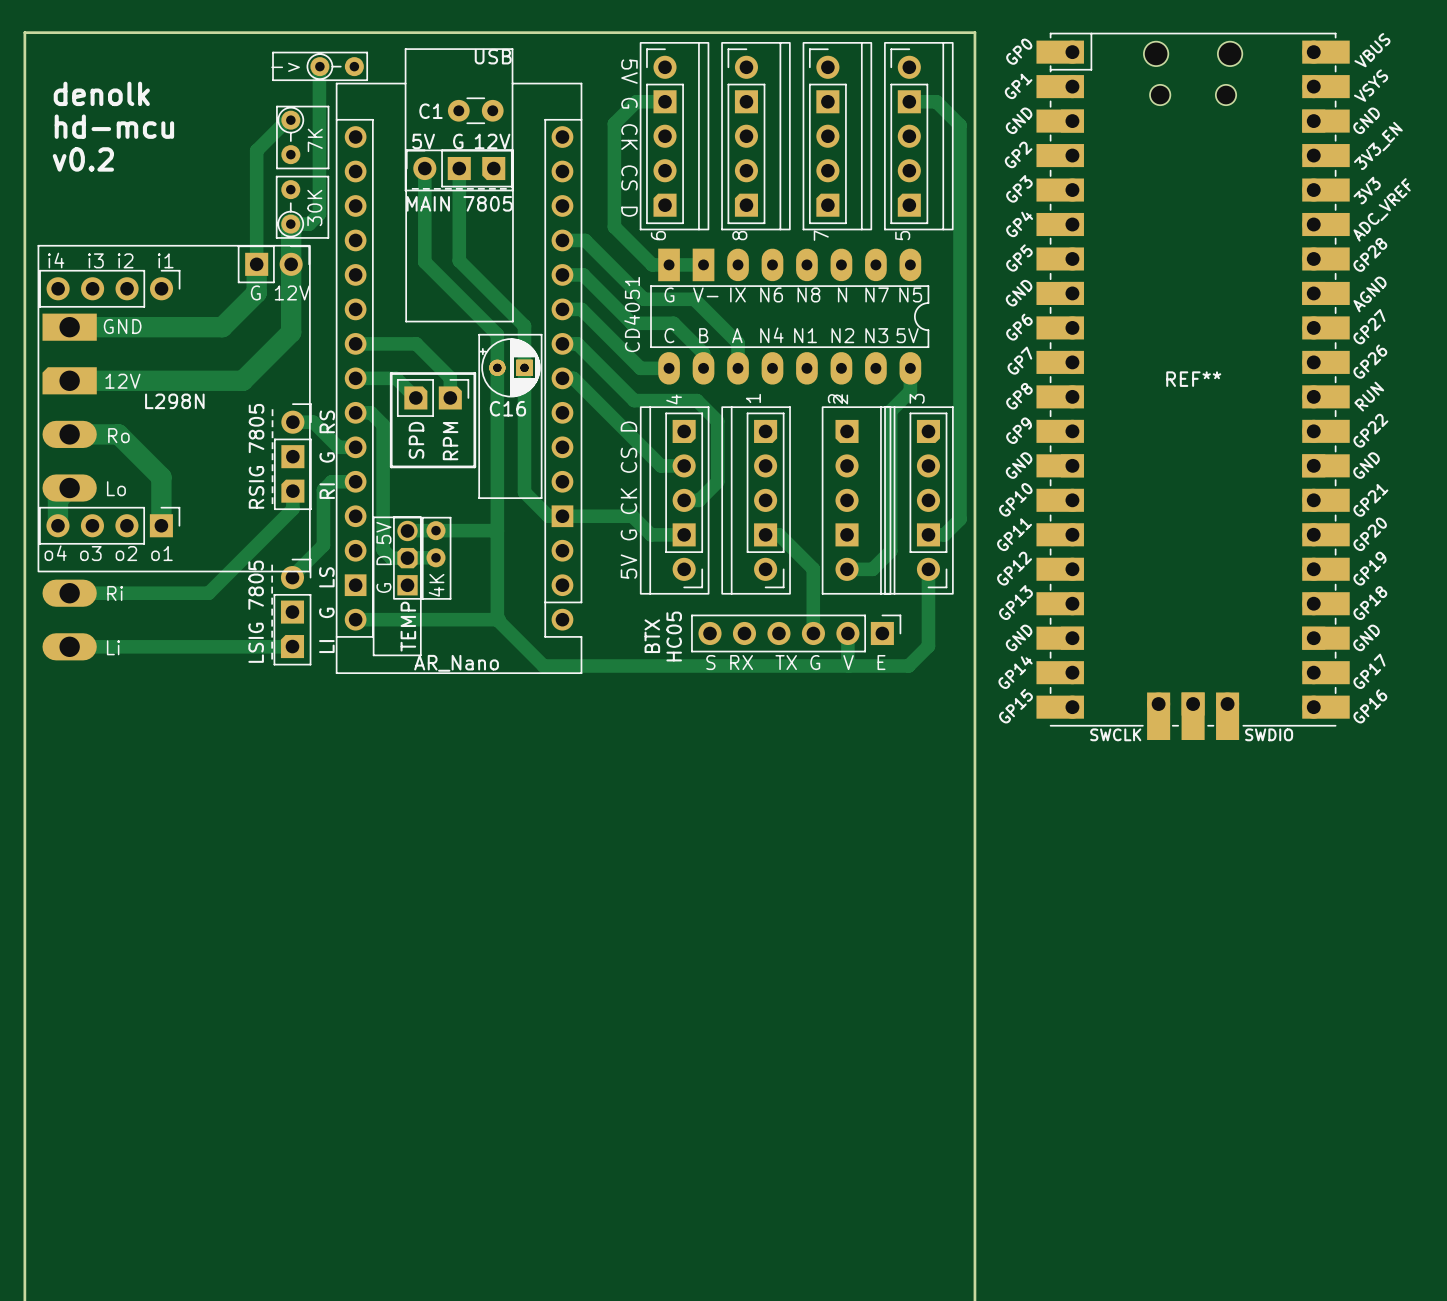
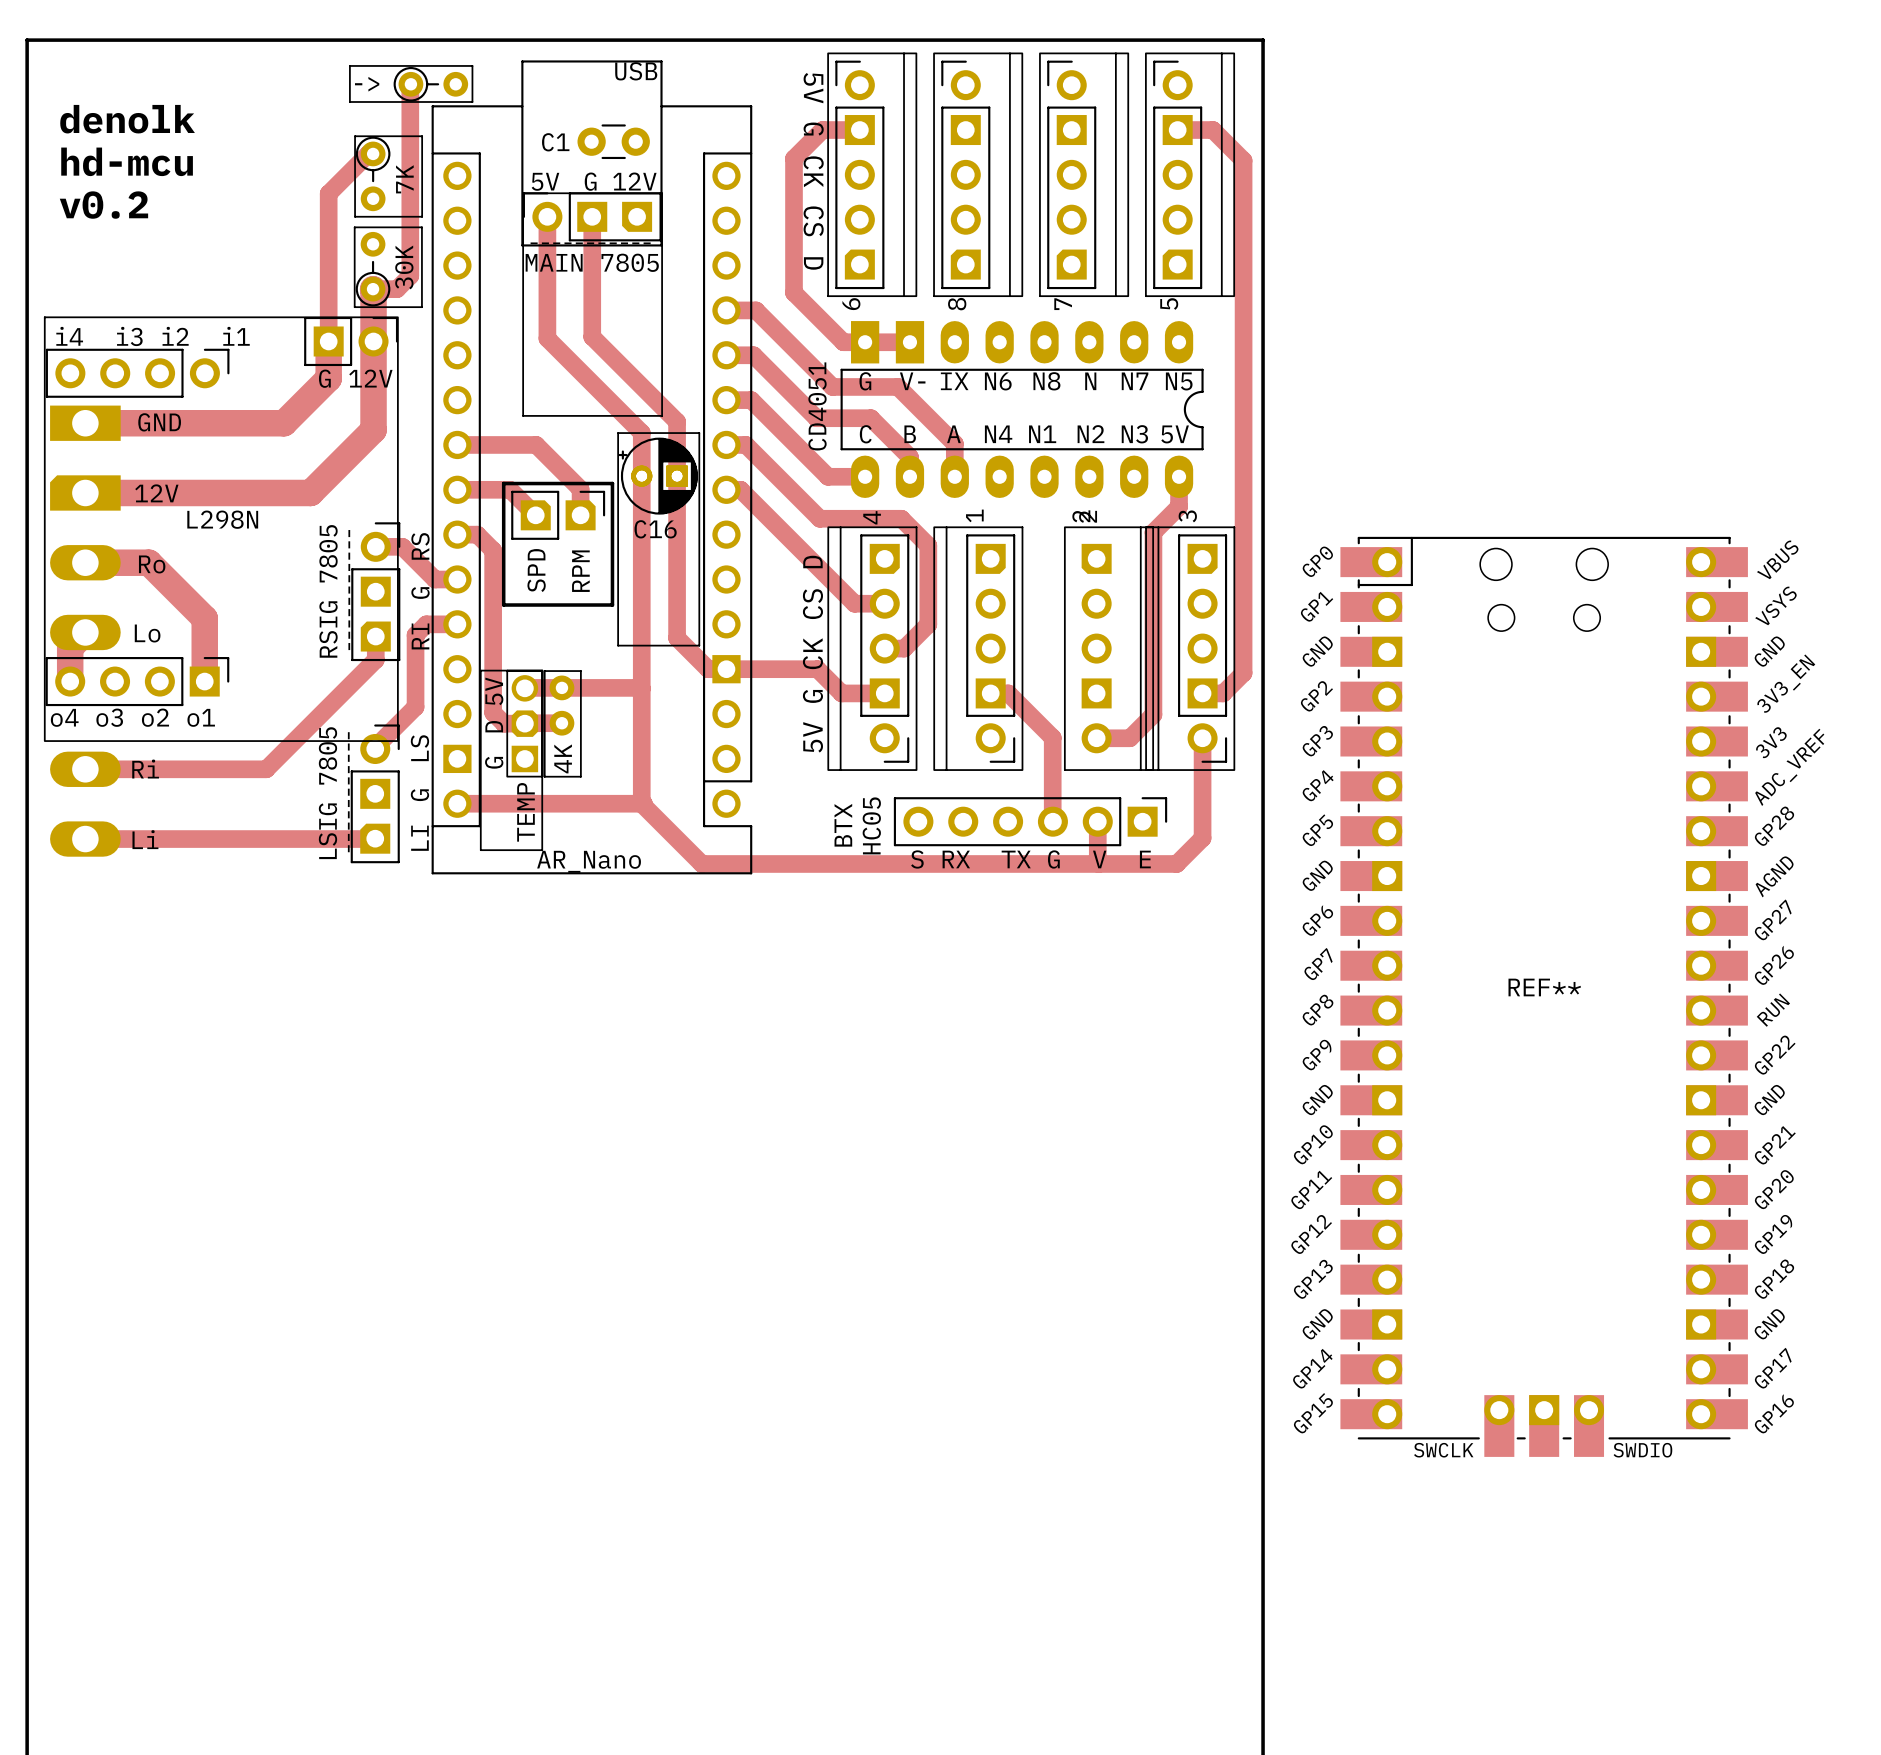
REF**: (1193, 386) -> none
REF**: none -> (1544, 996)

